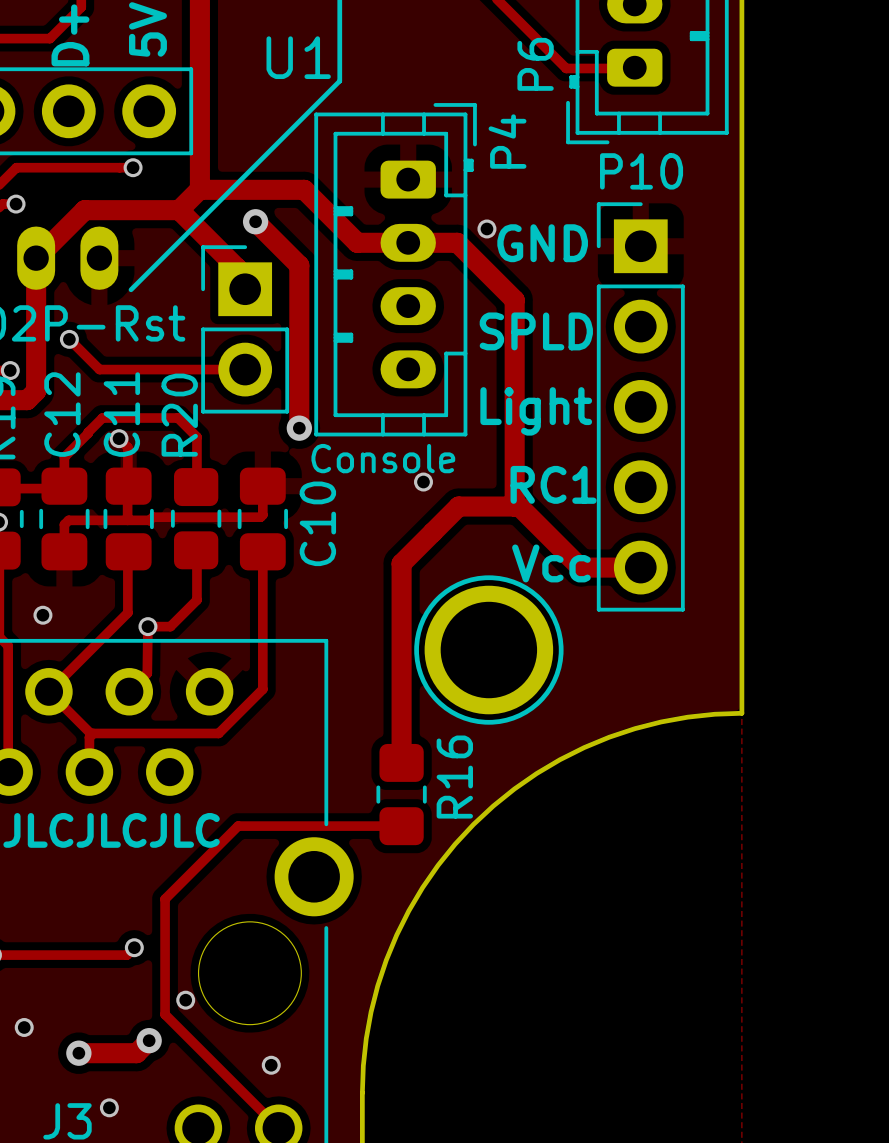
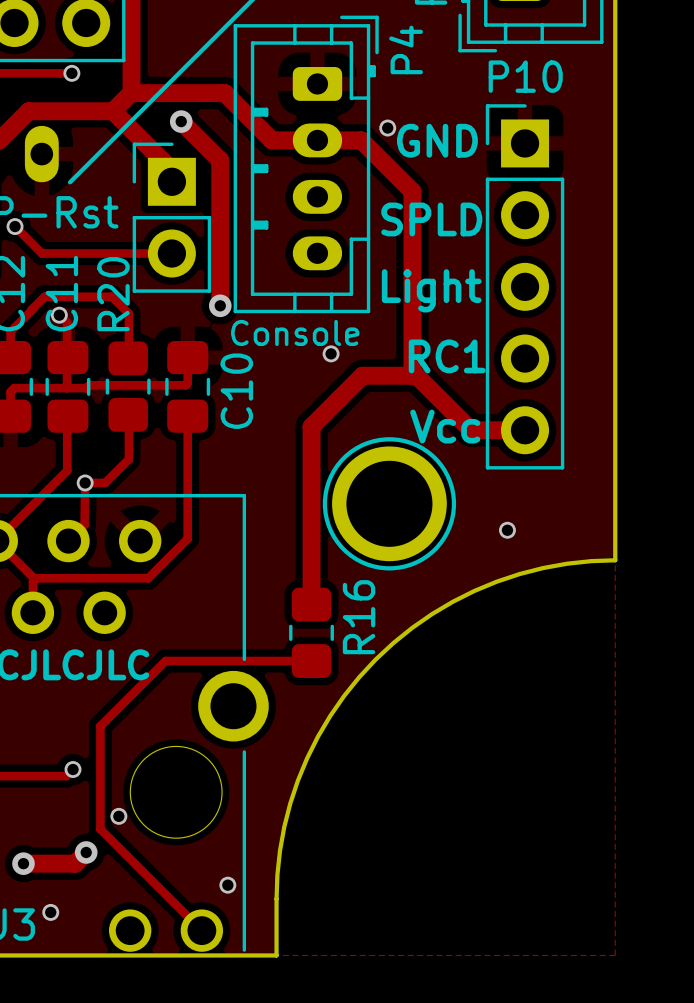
via: none -> (507, 530)
via position: (271, 1065) -> (227, 885)

